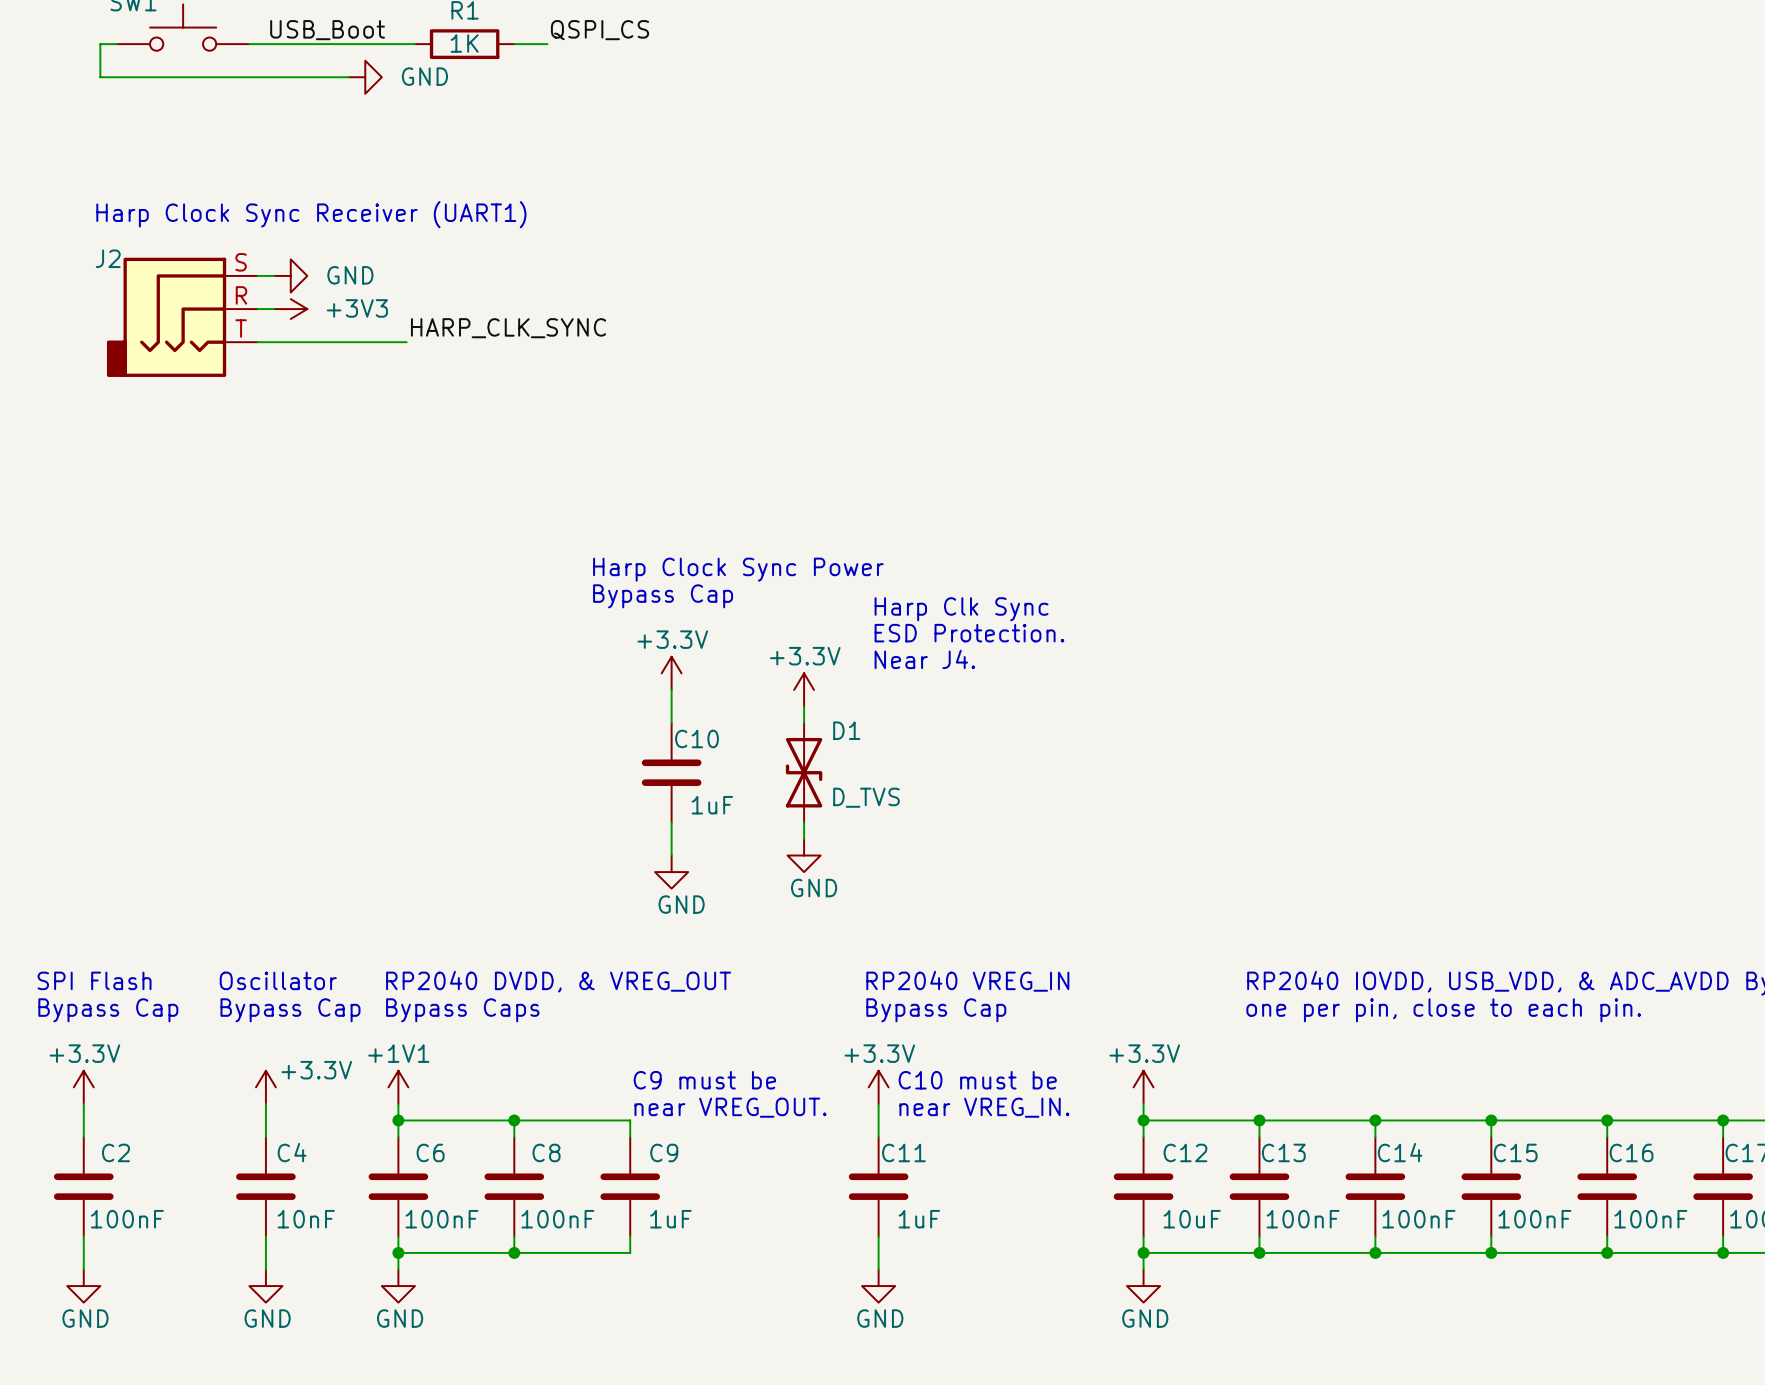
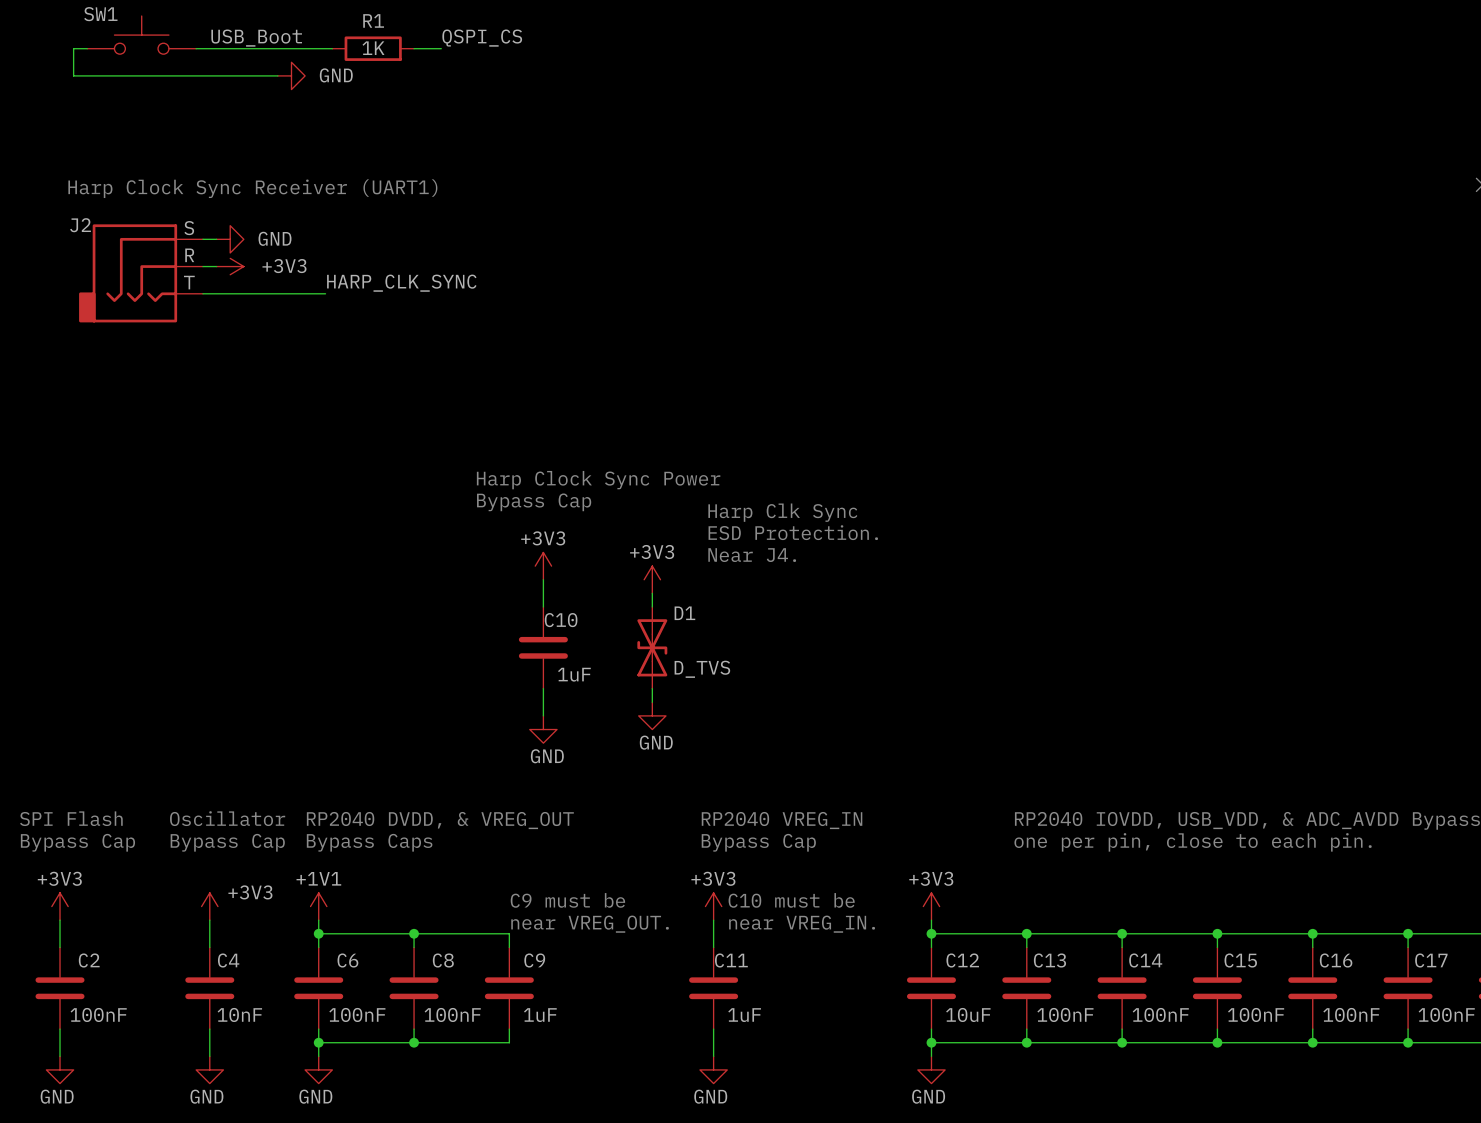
power symbol: +3.3V (671, 673) -> +3V3 (543, 566)
power symbol: +3.3V (804, 689) -> +3V3 (652, 579)
power symbol: +3.3V (83, 1087) -> +3V3 (60, 906)
power symbol: +3.3V (265, 1087) -> +3V3 (209, 906)
power symbol: +3.3V (878, 1087) -> +3V3 (713, 906)
power symbol: +3.3V (1143, 1087) -> +3V3 (931, 906)

